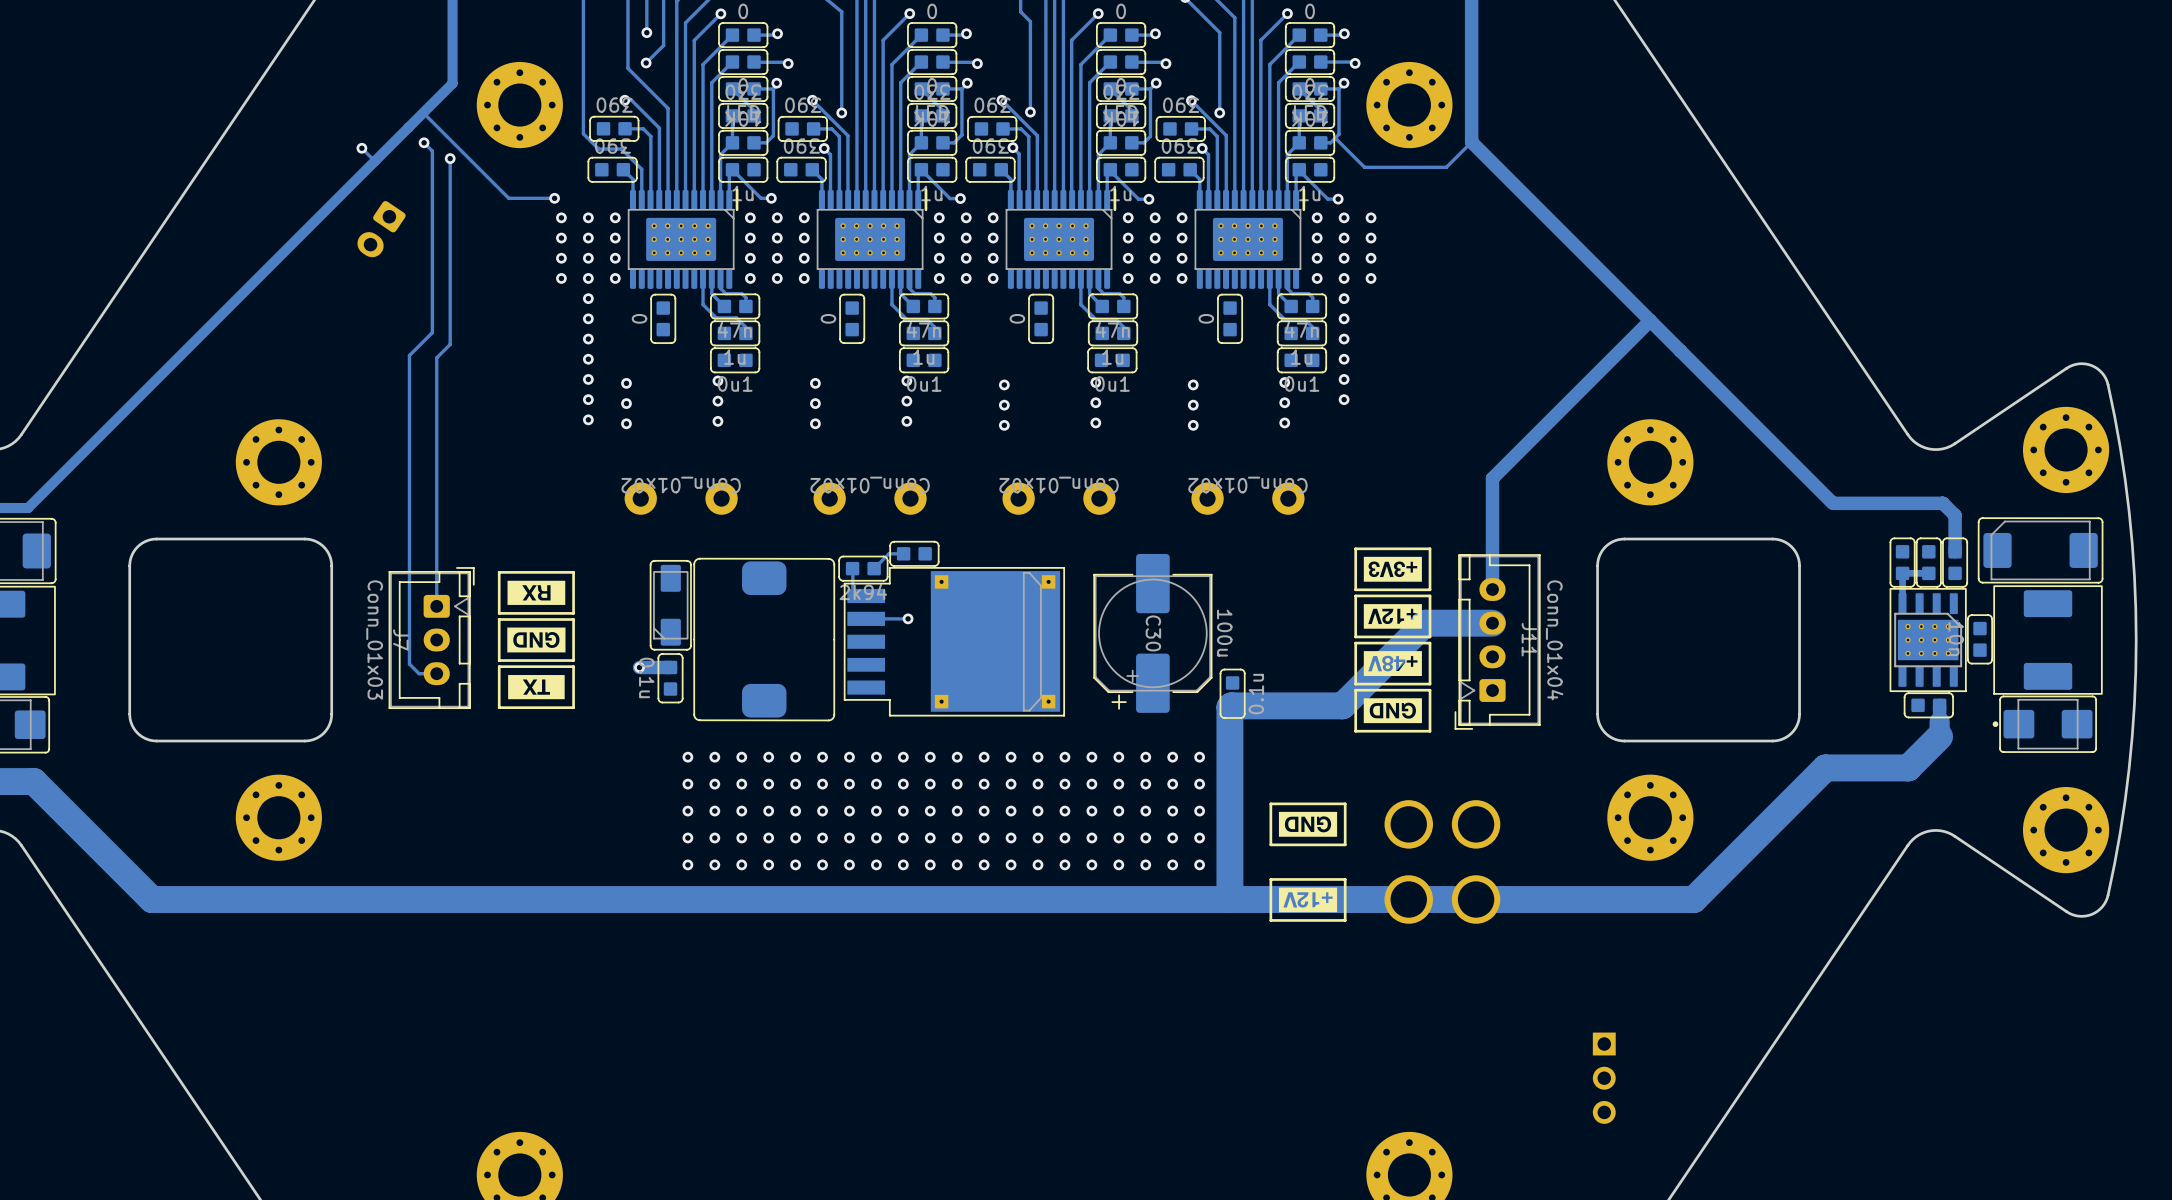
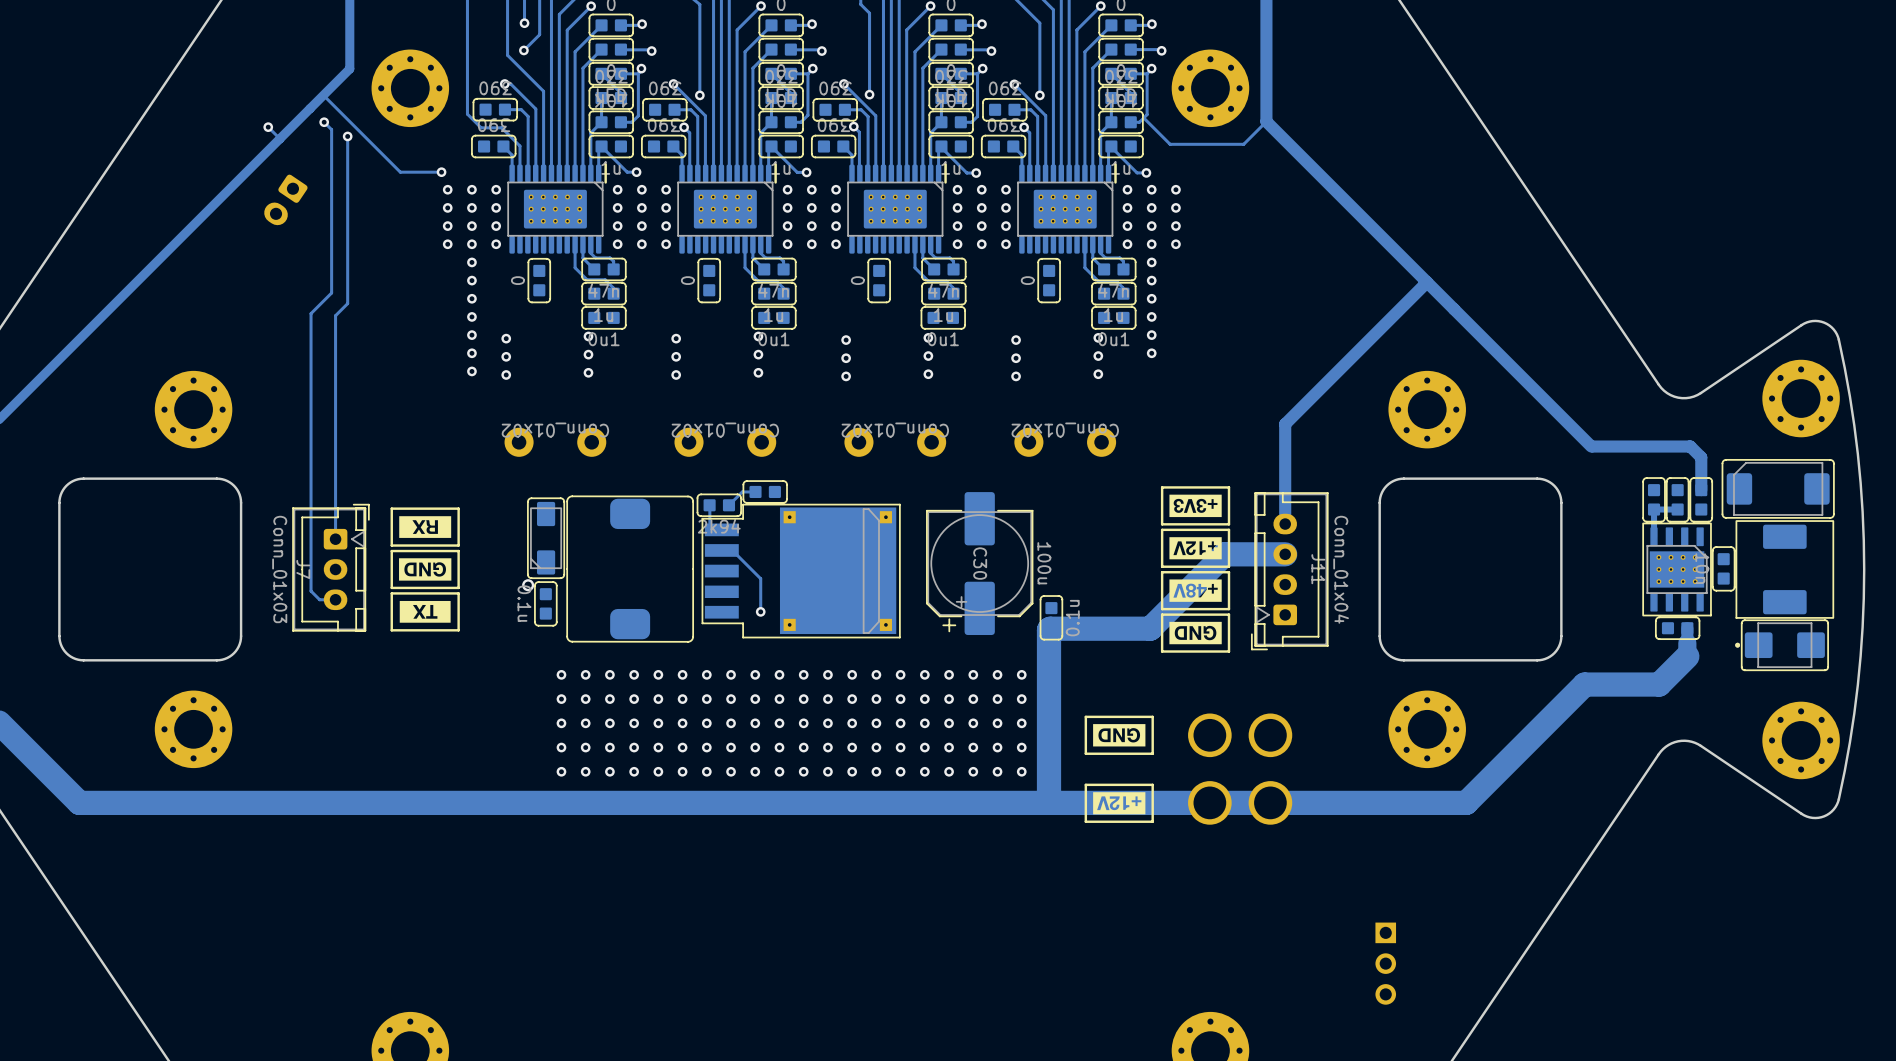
track: (908, 618) (877, 618) -> (760, 611) (760, 578) (732, 550)
via position: (908, 618) -> (760, 611)
via: none -> (528, 585)
via: (639, 667) -> none
track: (670, 667) (639, 667) -> none

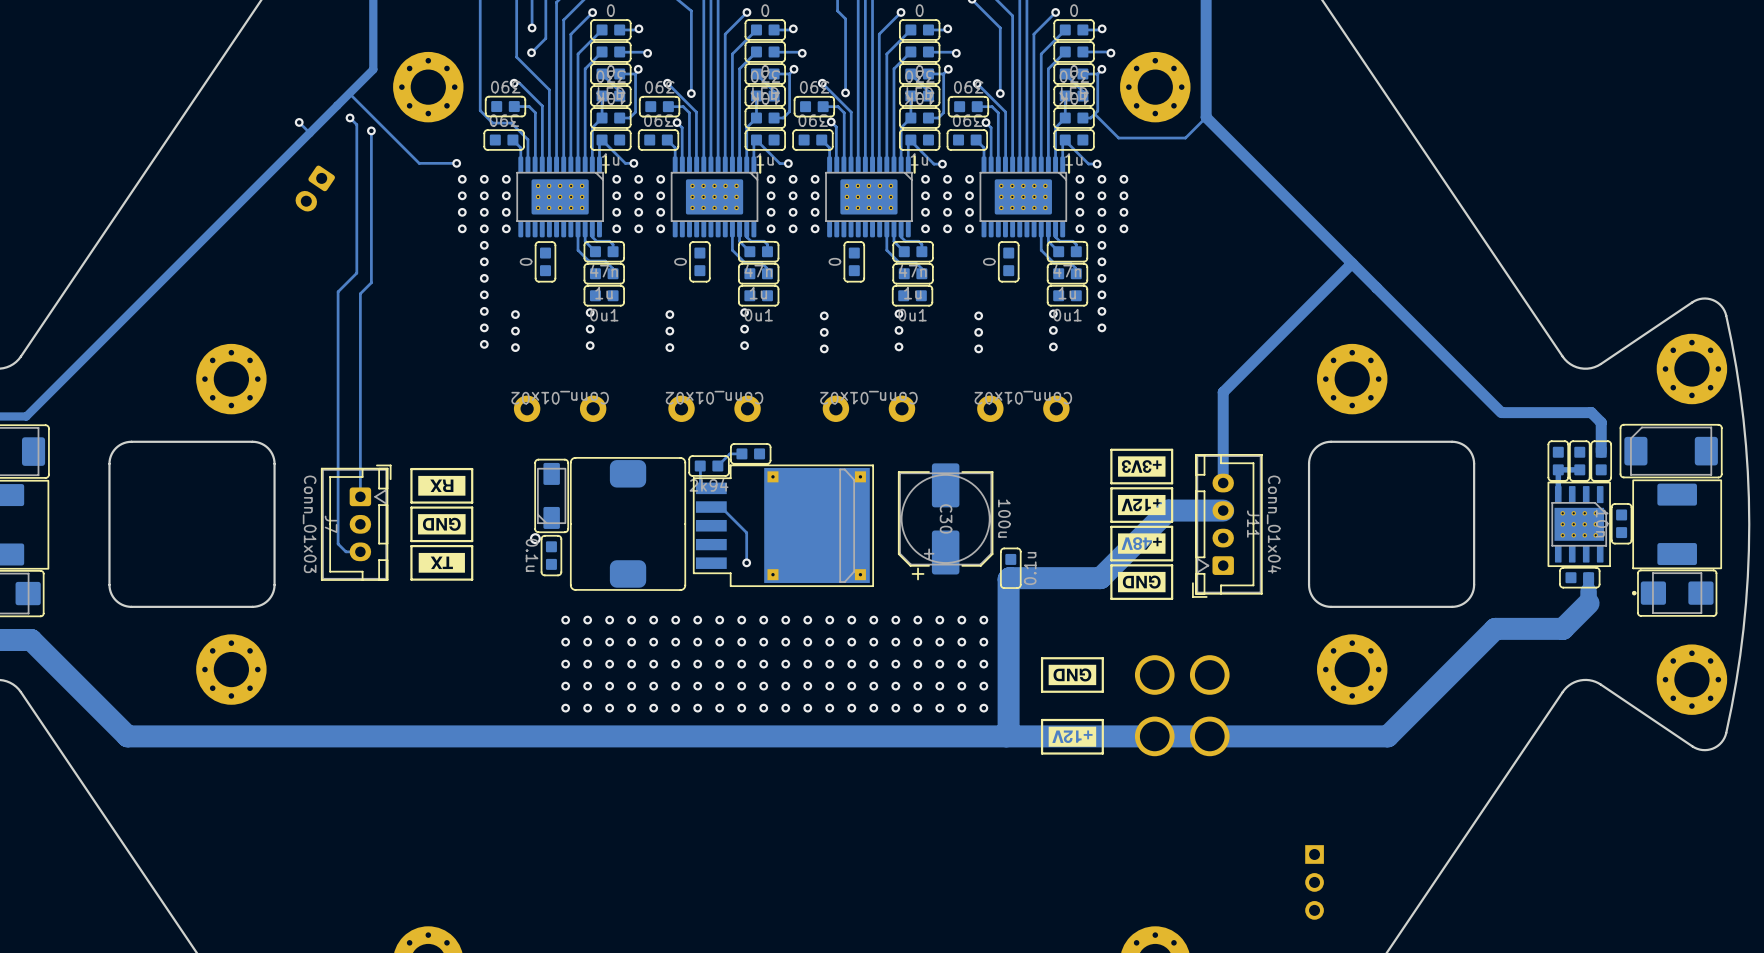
C30 footprint: [926, 492, 1034, 636] -> [898, 463, 994, 581]

